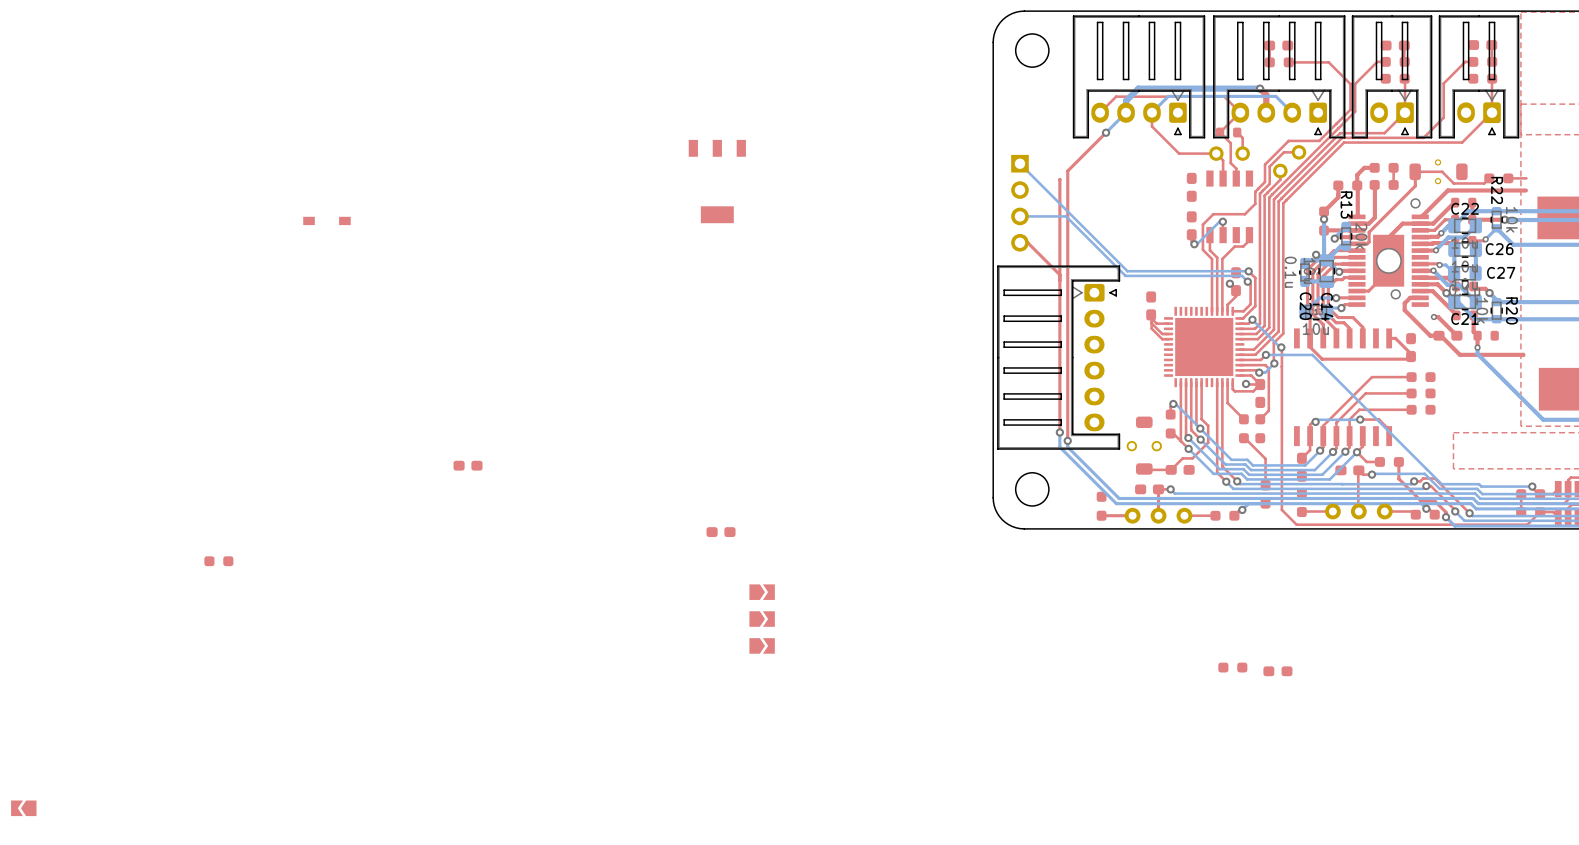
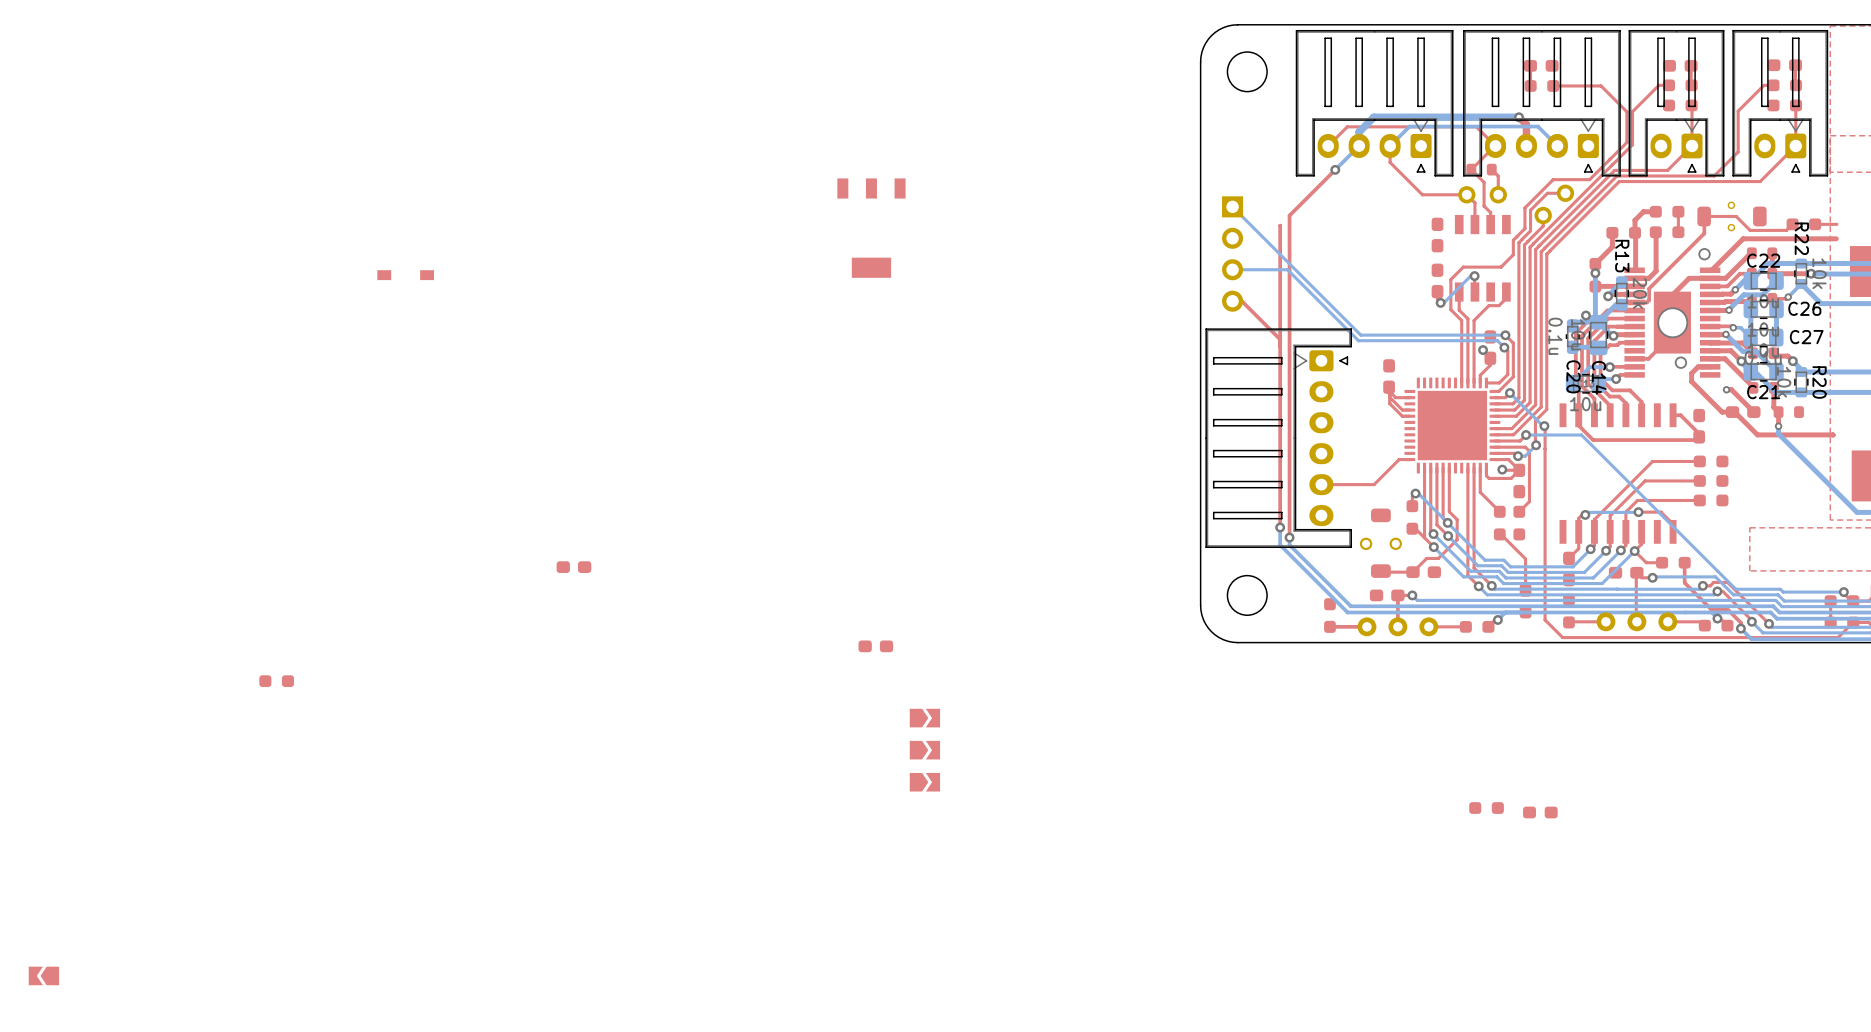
top track: none -> (1409, 459) (1399, 459) (1374, 484) (1321, 484)

